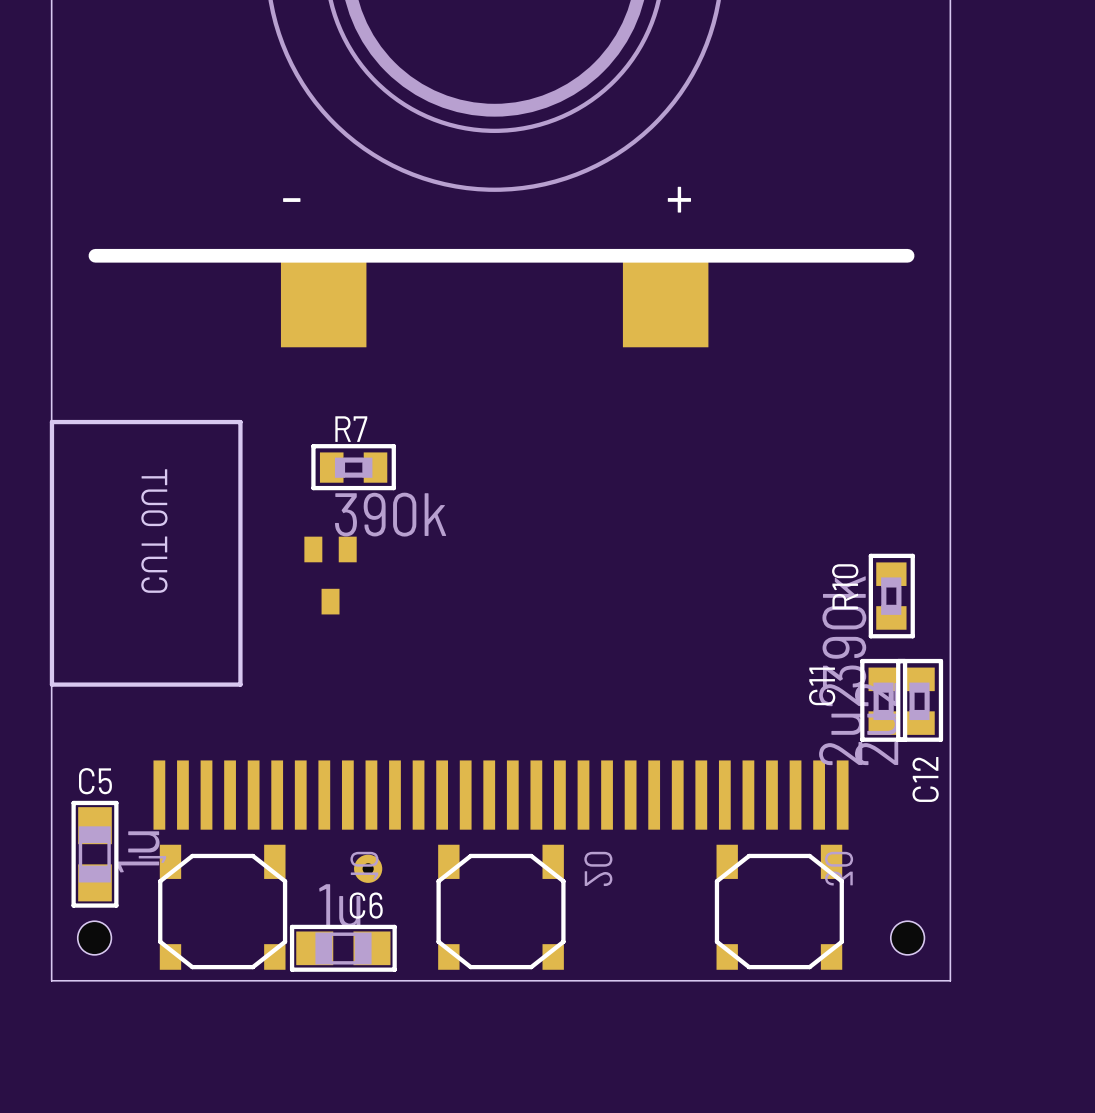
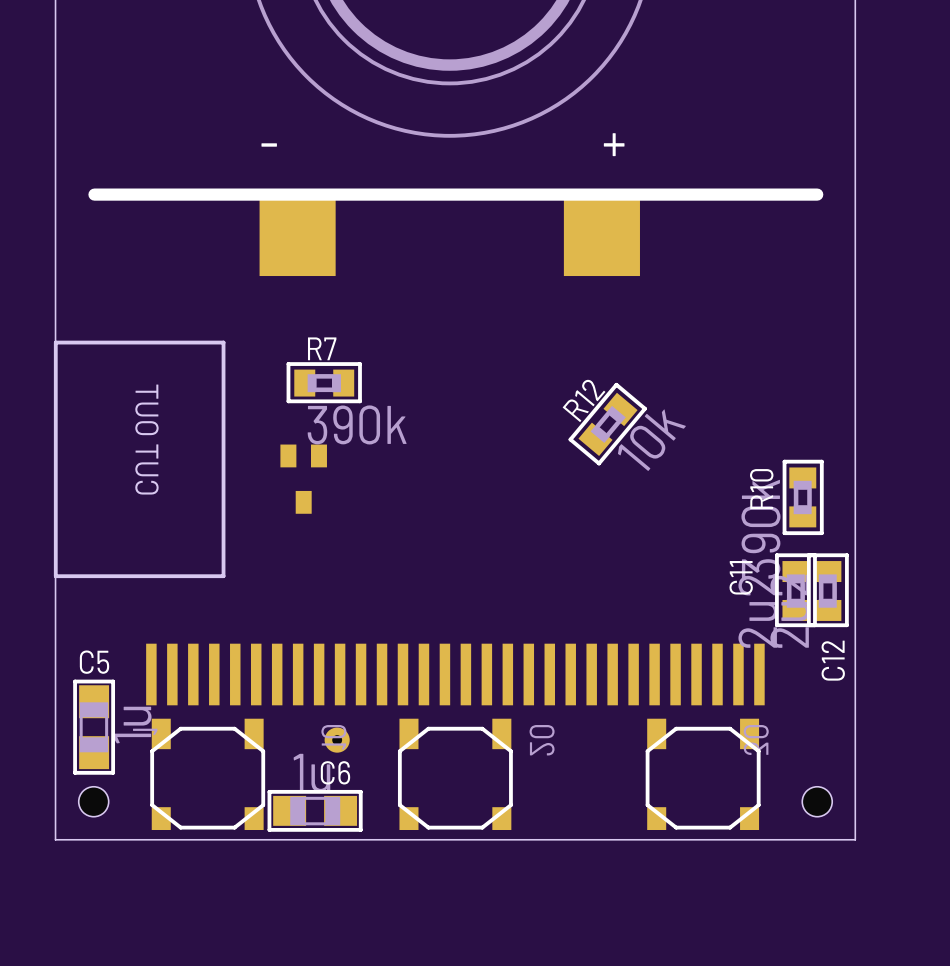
R12: none -> 10k (607, 424)

